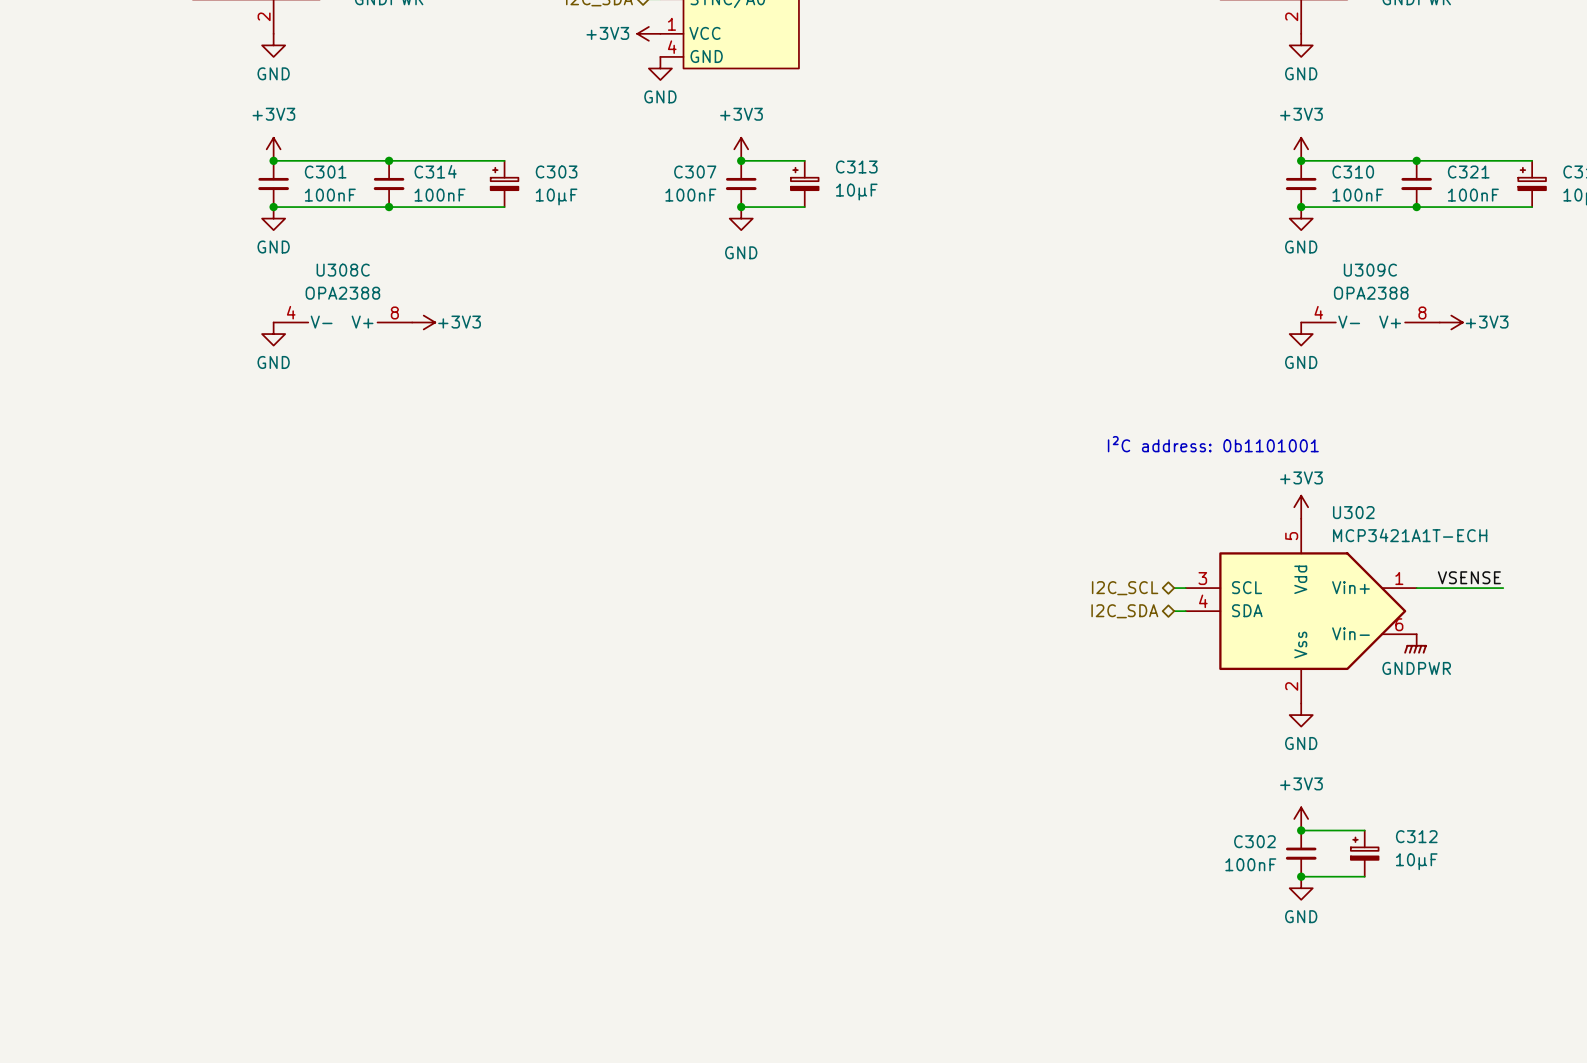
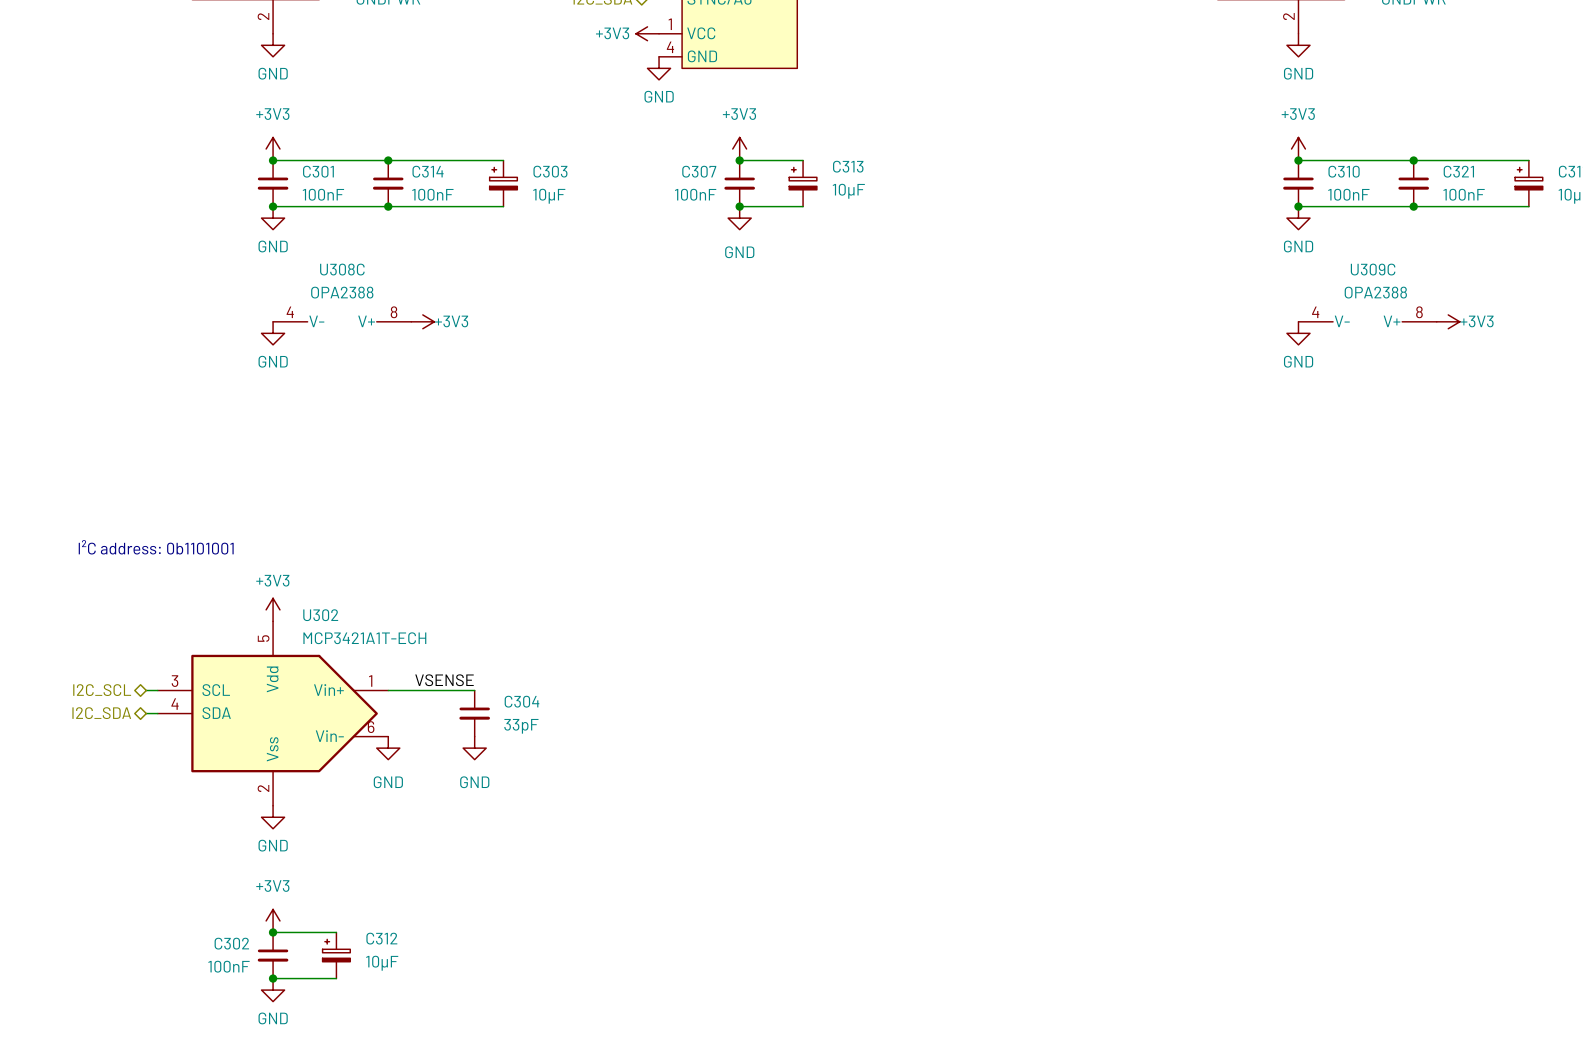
text: I²C address: 0b1101001 (1213, 444) -> none
power symbol: +3V3 (1301, 507) -> none
text: none -> I²C address: 0b1101001 (156, 547)
label: VSENSE (1469, 577) -> none
hierarchical label: I2C_SCL (1125, 588) -> none
wire: (1174, 588) (1185, 588) -> none
wire: (1416, 588) (1503, 588) -> none
power symbol: none -> +3V3 (273, 609)
hierarchical label: I2C_SDA (1124, 611) -> none
wire: (1174, 611) (1185, 611) -> none
U302 position: (1301, 611) -> (273, 713)
power symbol: GNDPWR (1415, 643) -> none
label: none -> VSENSE (444, 680)
wire: none -> (146, 690) (157, 690)
wire: none -> (388, 690) (474, 690)
hierarchical label: none -> I2C_SCL (102, 690)
hierarchical label: none -> I2C_SDA (101, 713)
wire: none -> (146, 713) (157, 713)
C304: none -> 33pF (474, 713)
power symbol: GND (1301, 715) -> none
power symbol: none -> GND (388, 748)
power symbol: none -> GND (474, 748)
power symbol: none -> GND (273, 817)
power symbol: +3V3 (1301, 818) -> none
wire: (1301, 830) (1364, 830) -> none
junction: (1301, 830) -> none
C302 position: (1301, 853) -> (273, 955)
C312 position: (1364, 853) -> (336, 955)
wire: (1301, 876) (1364, 876) -> none
junction: (1301, 876) -> none
power symbol: GND (1301, 888) -> none
power symbol: none -> +3V3 (273, 920)
wire: none -> (273, 932) (336, 932)
junction: none -> (273, 932)
wire: none -> (273, 978) (336, 978)
junction: none -> (273, 978)
power symbol: none -> GND (273, 990)

